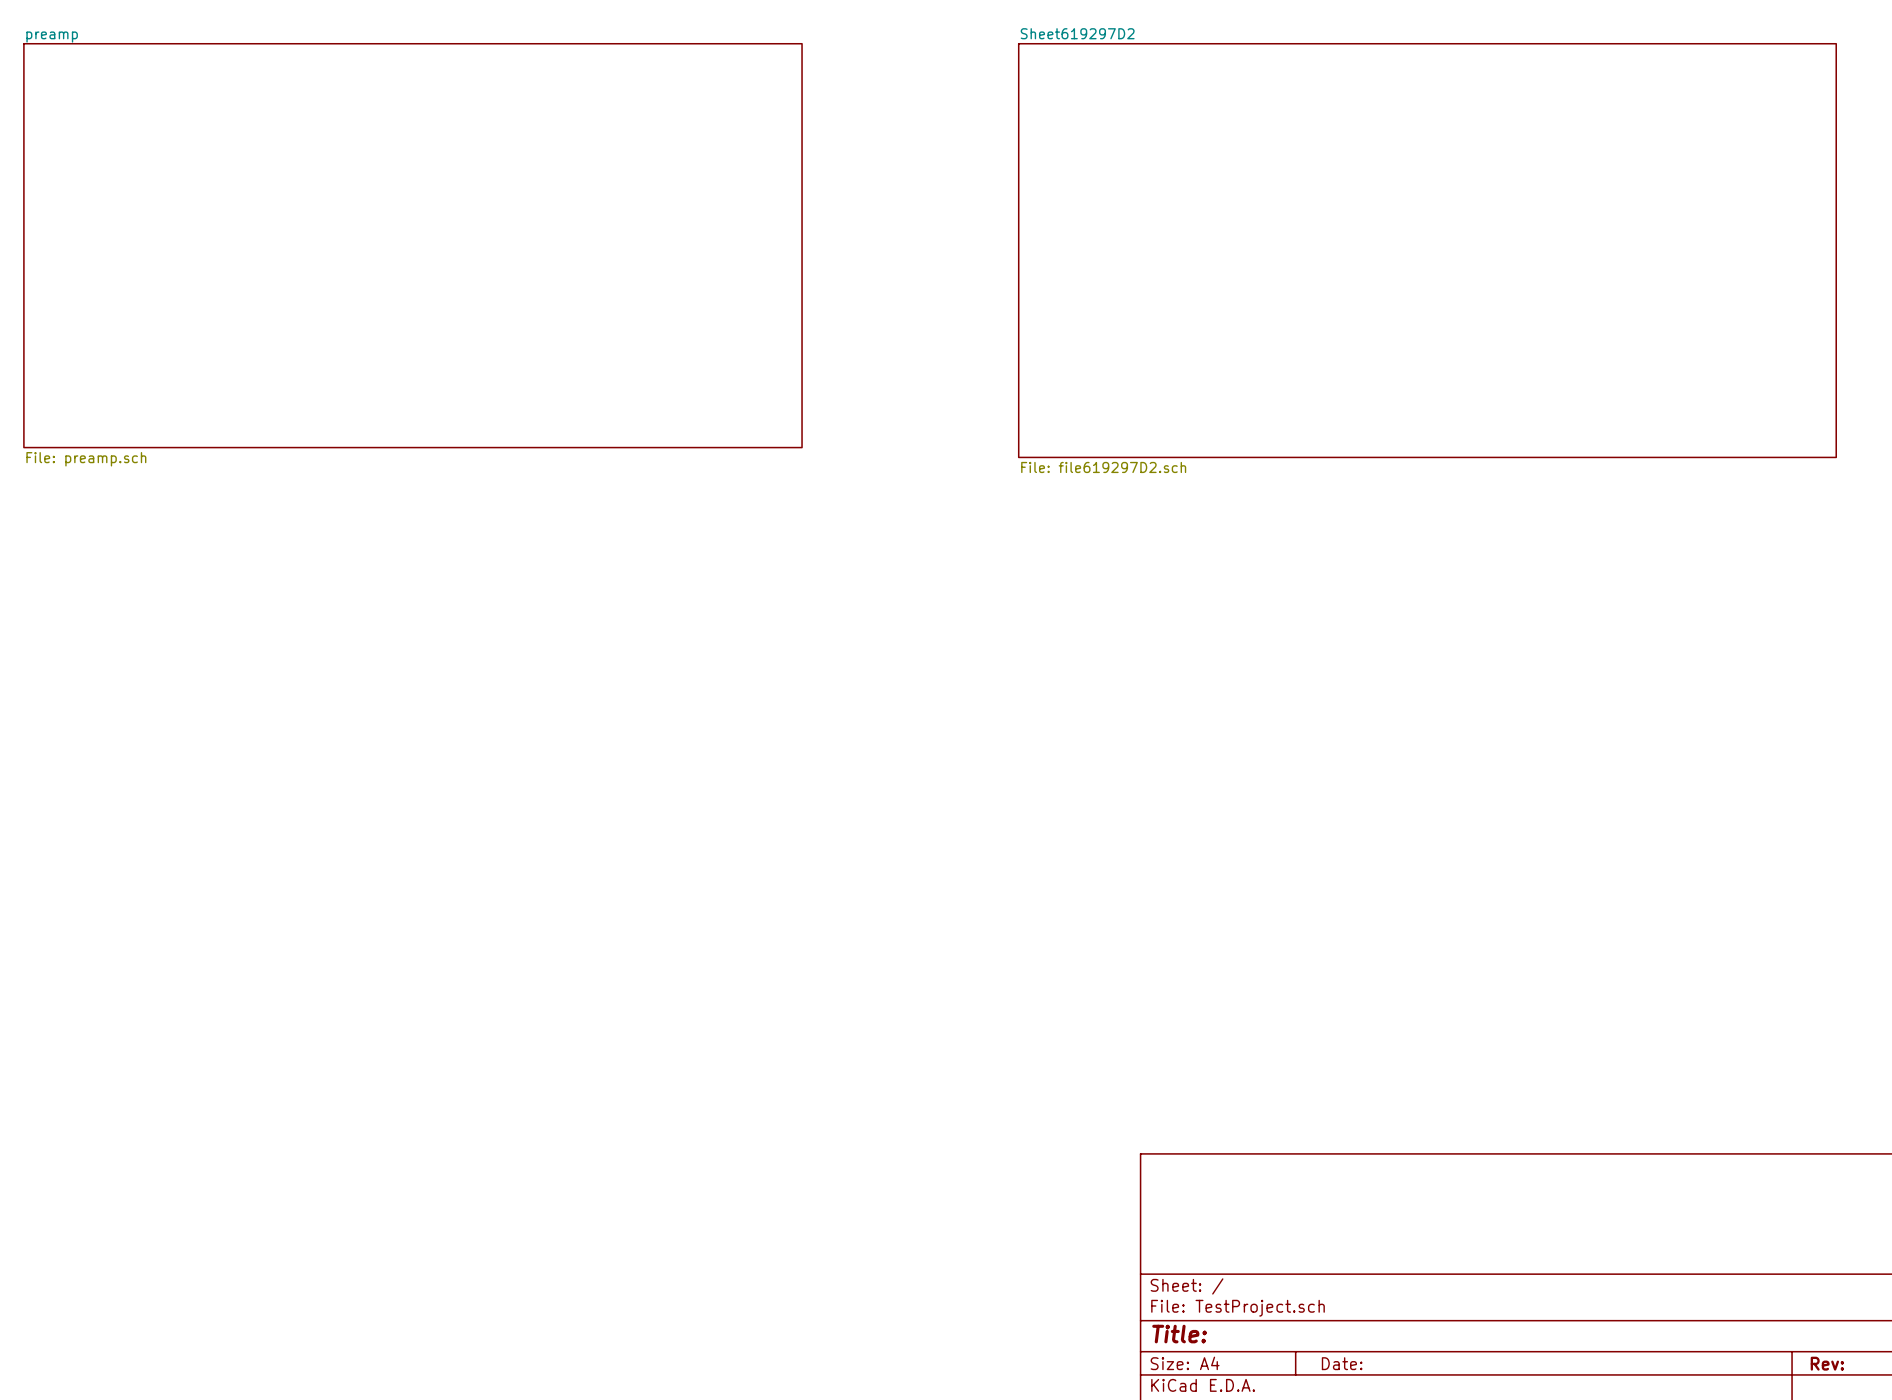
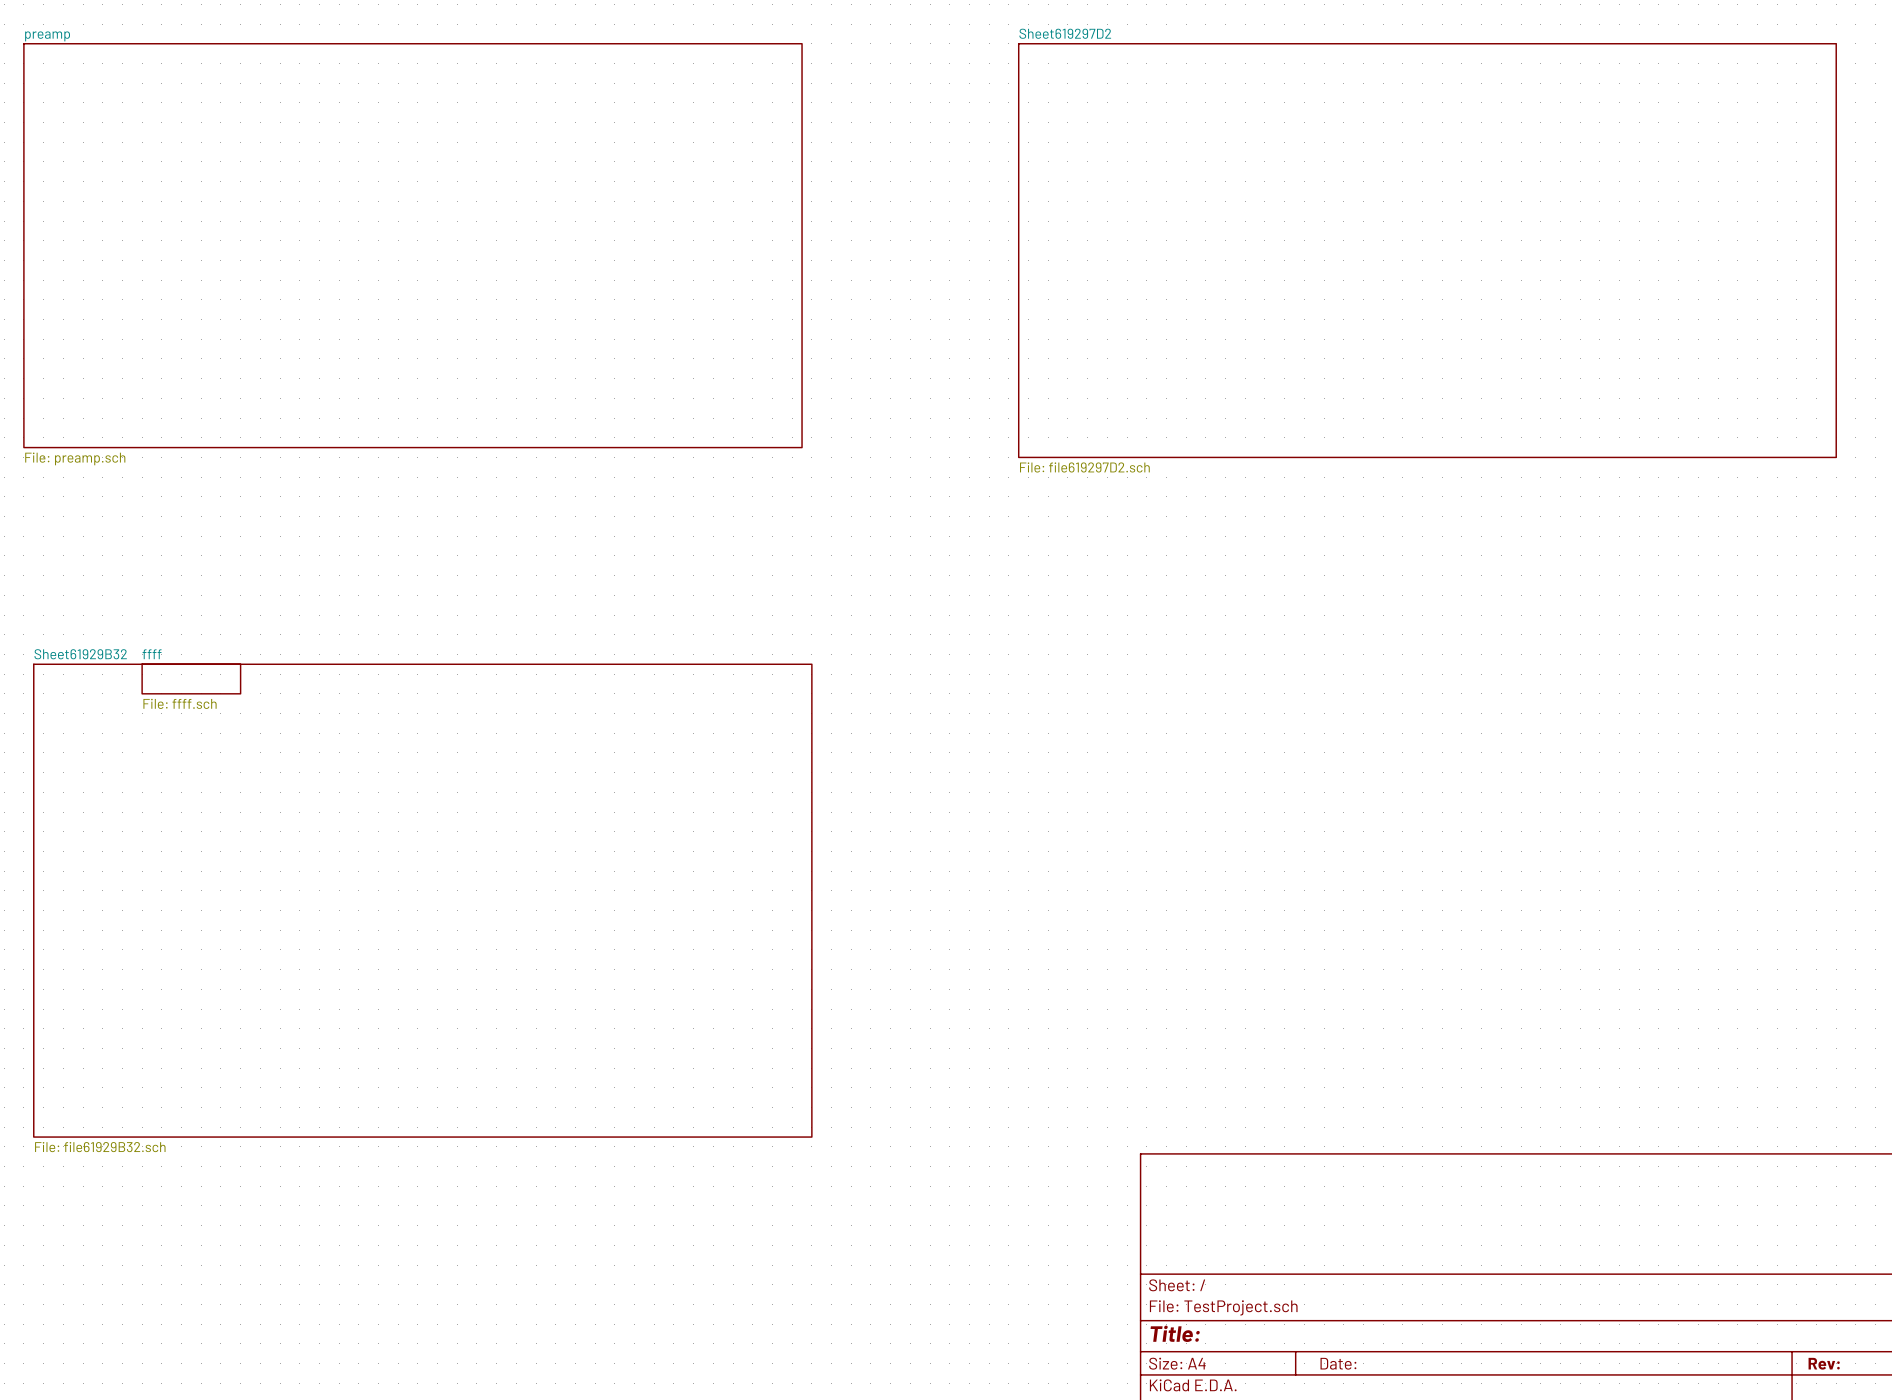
sheet ffff: none -> File: ffff.sch (191, 679)
sheet Sheet61929B32: none -> File: file61929B32.sch (422, 900)

